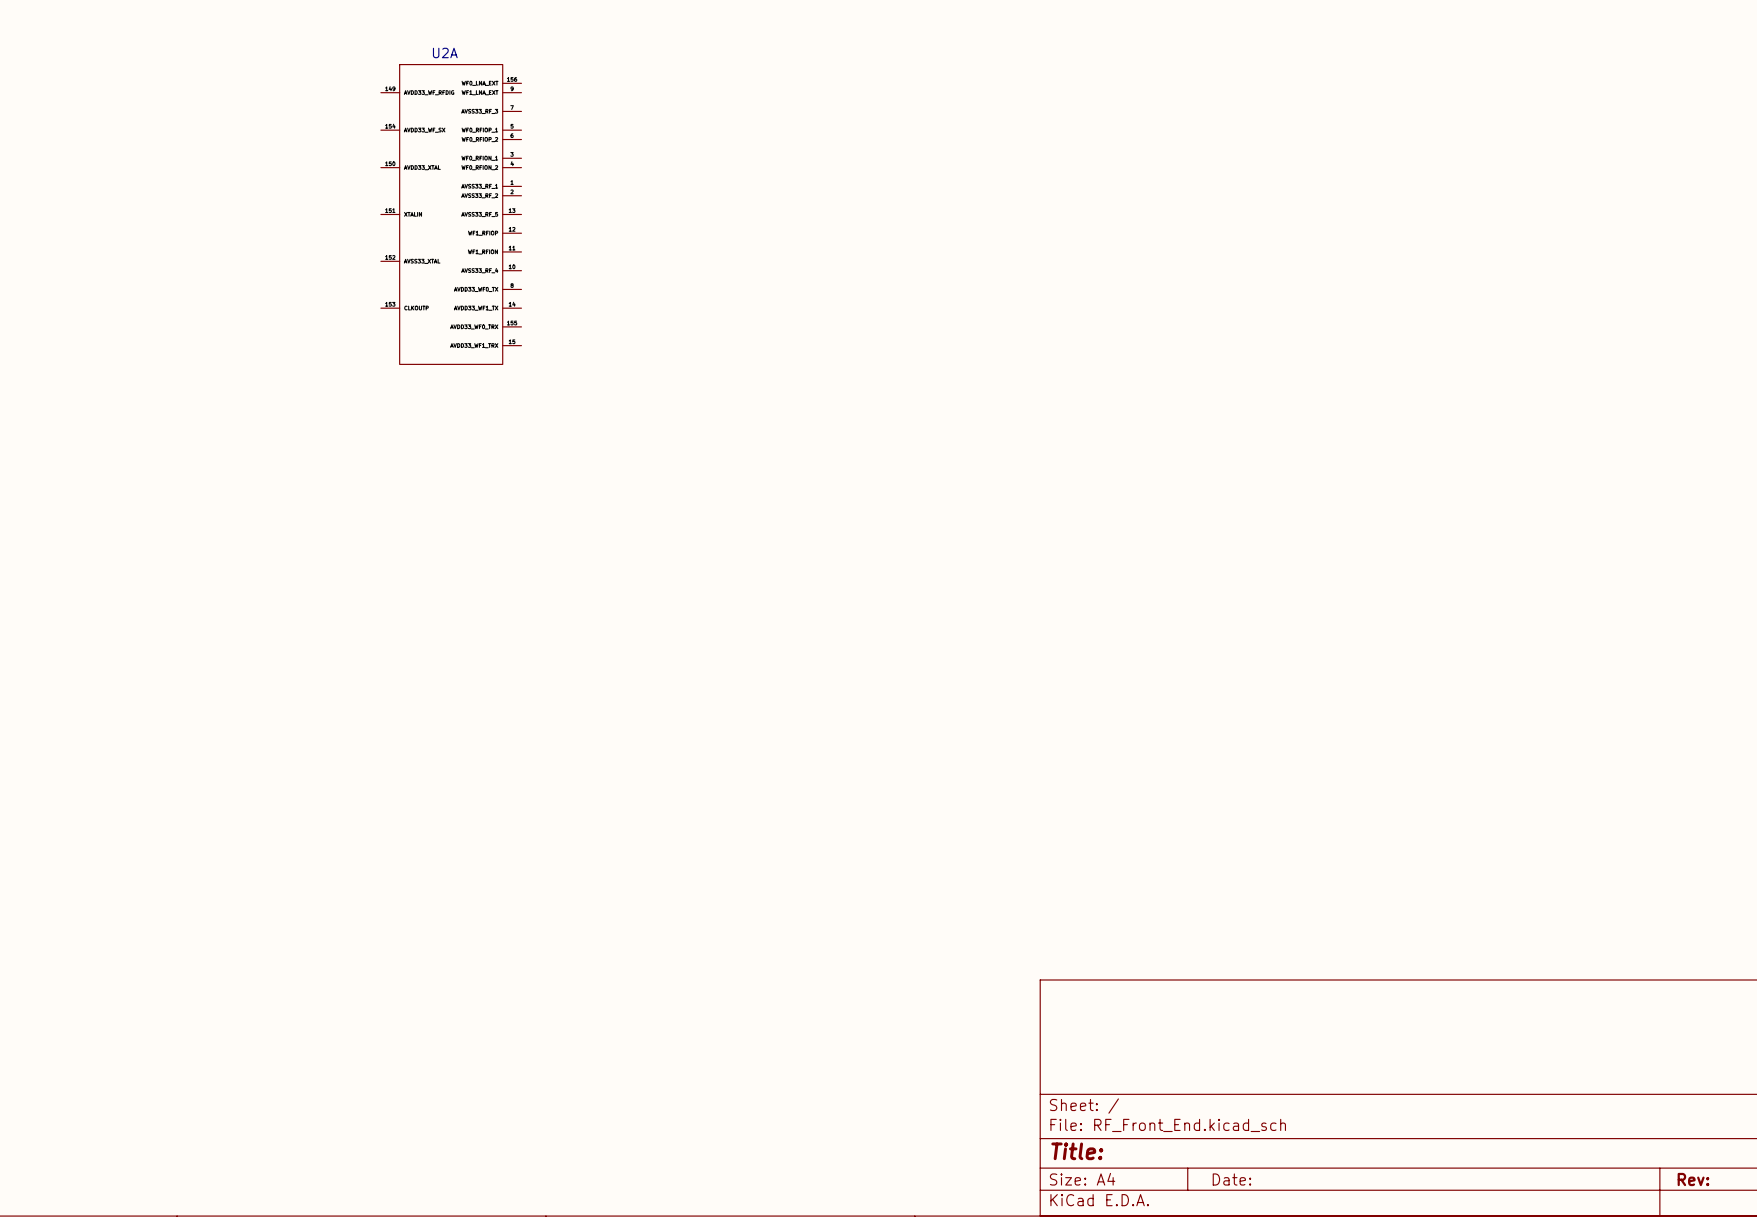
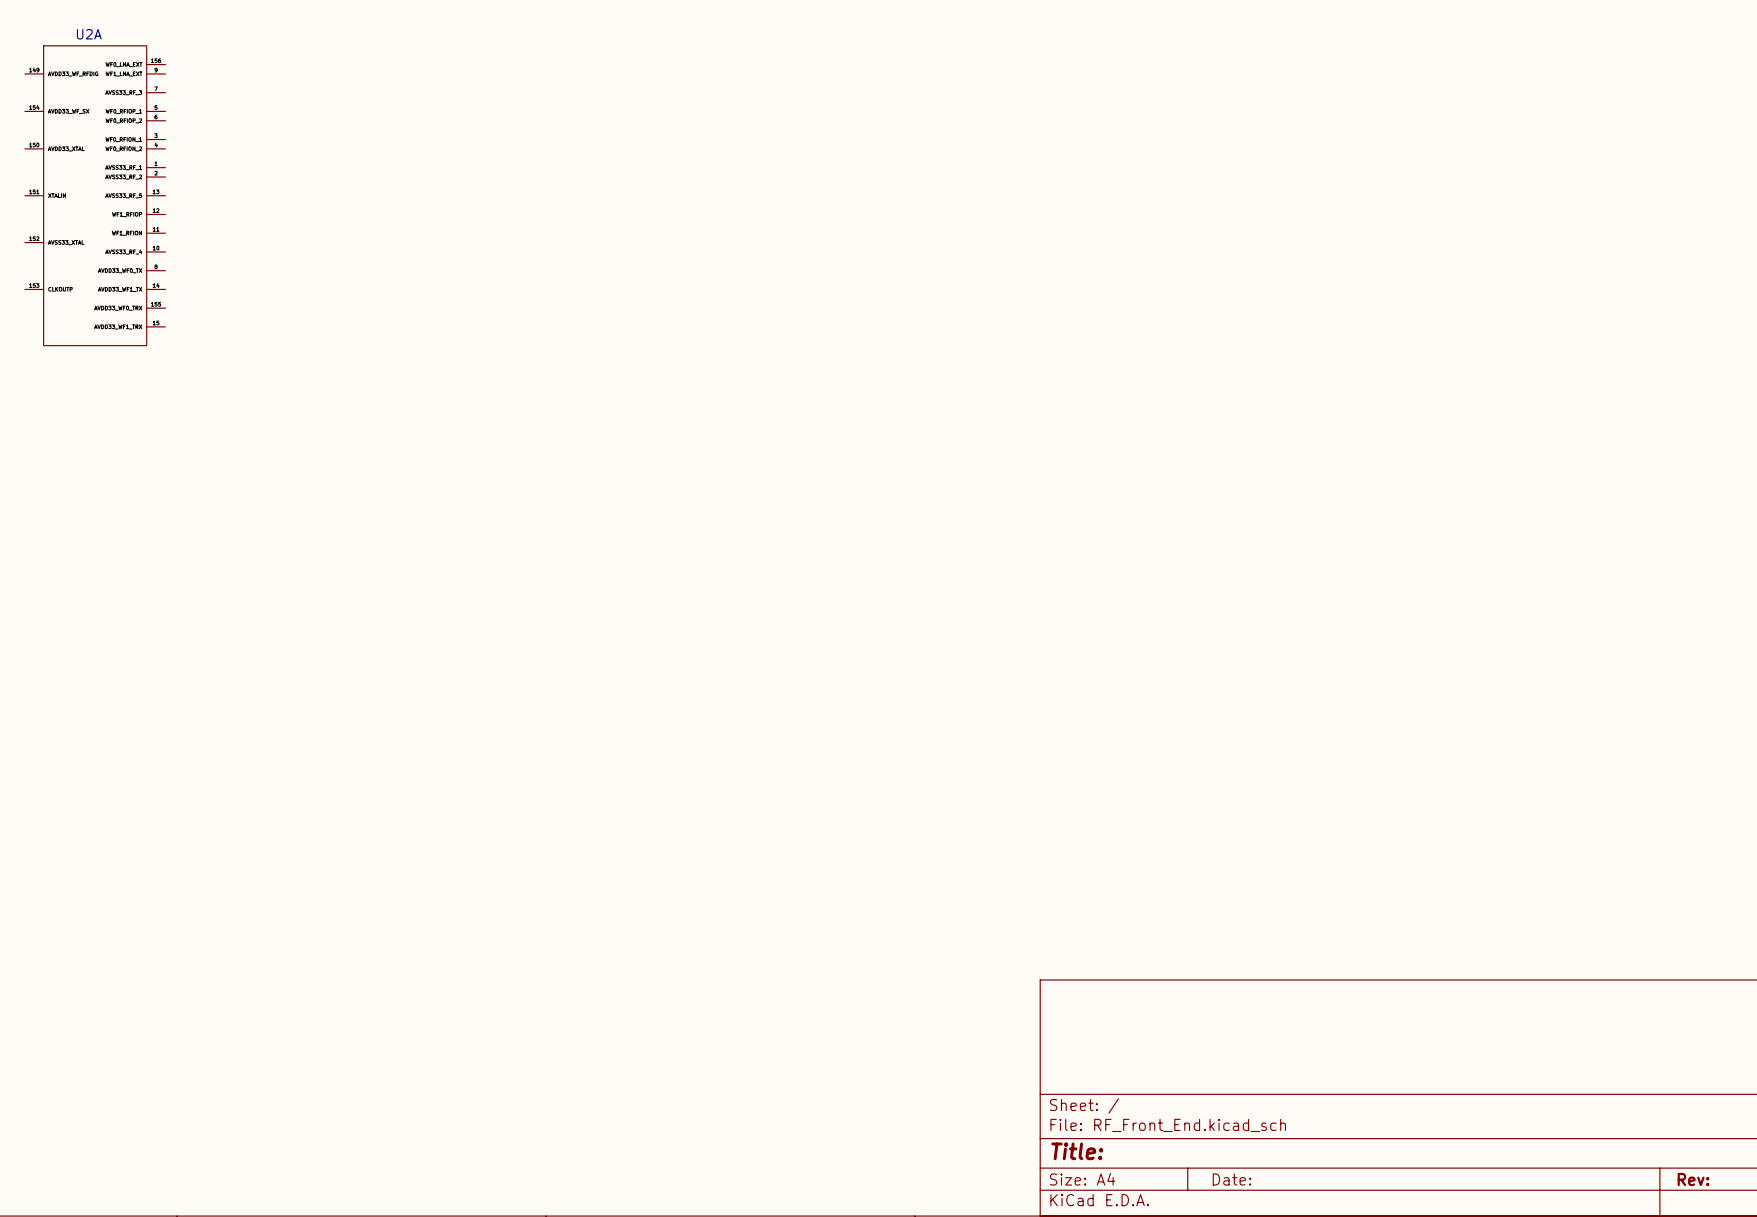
U2A position: (451, 214) -> (95, 195)

